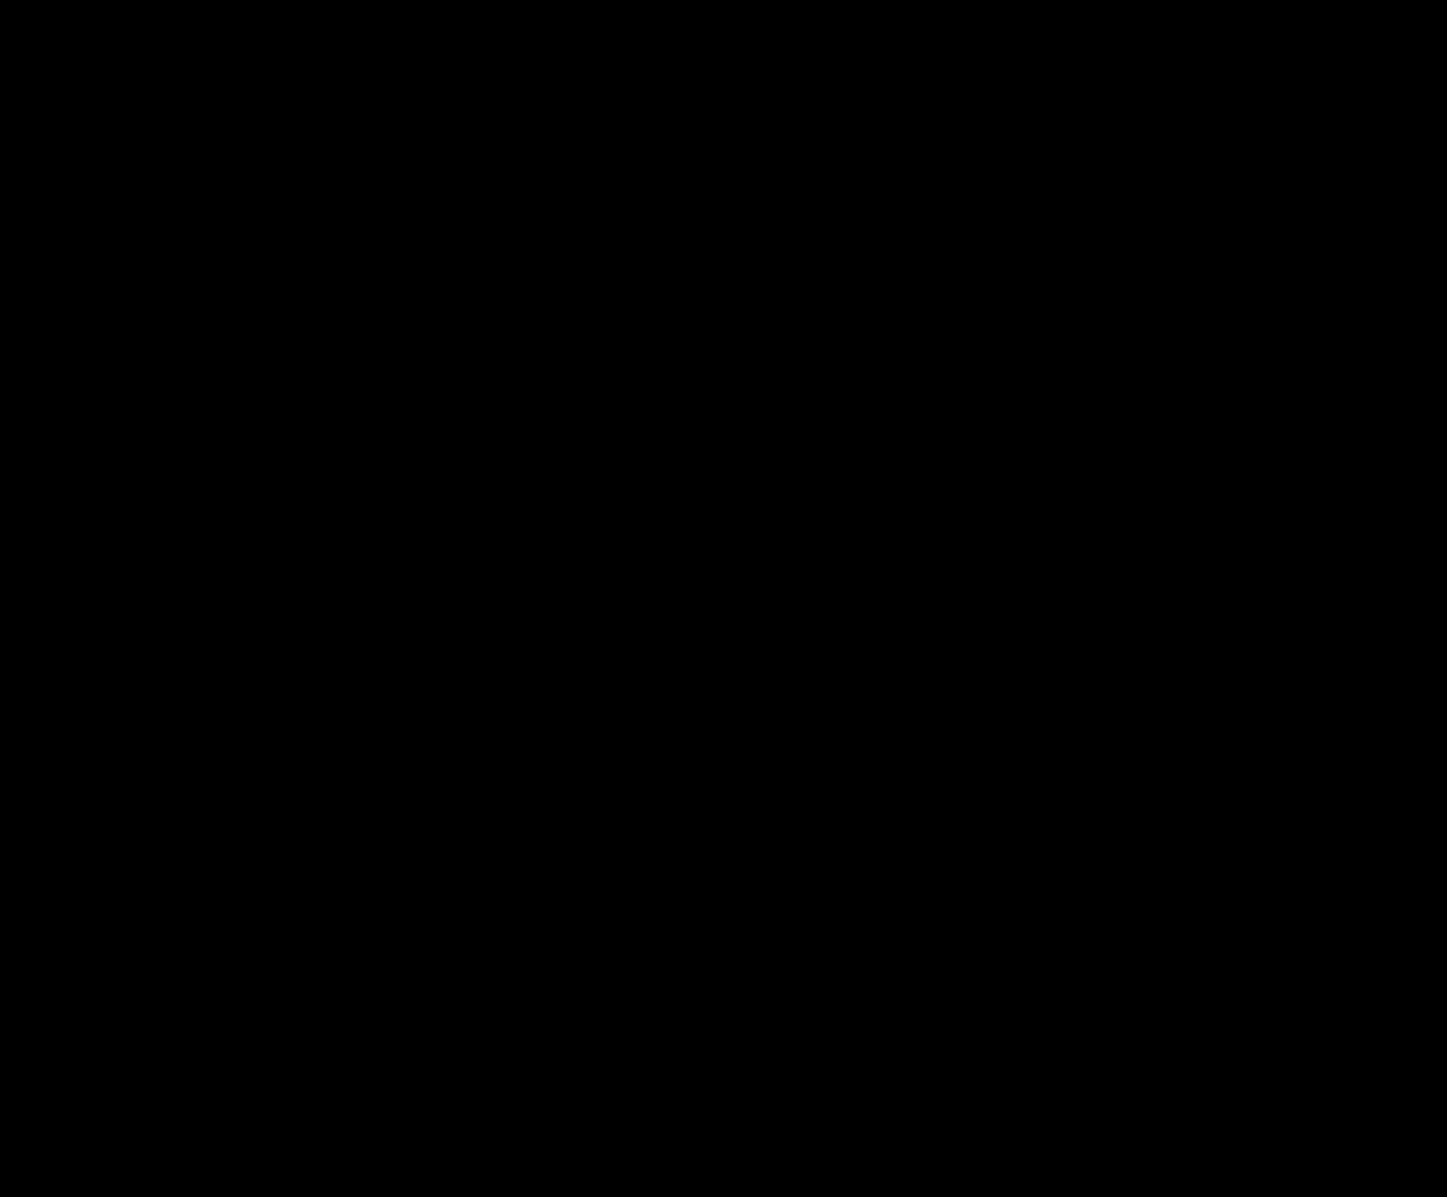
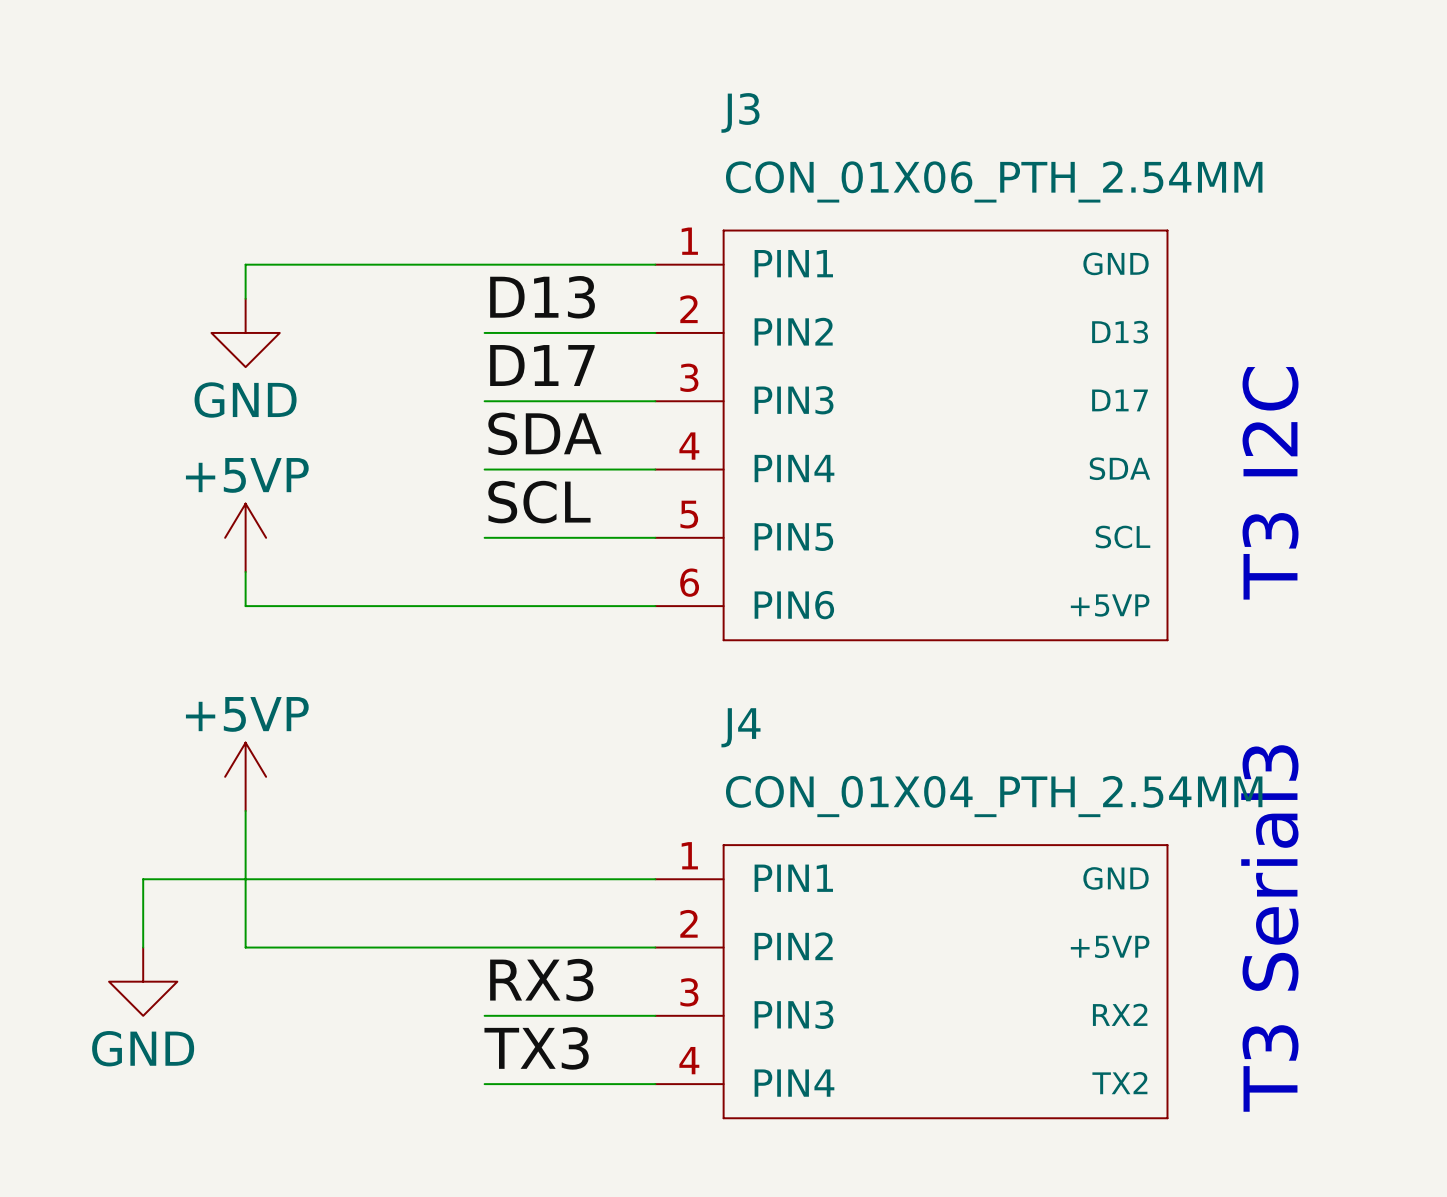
wire: none -> (655, 264) (245, 264) (245, 298)
label: none -> D13 (542, 297)
power symbol: none -> GND (245, 332)
wire: none -> (484, 332) (655, 332)
label: none -> D17 (542, 365)
wire: none -> (484, 401) (655, 401)
label: none -> SDA (544, 433)
J3: none -> CON_01X06_PTH_2.54MM (911, 435)
text: none -> T3 I2C (1270, 483)
wire: none -> (484, 469) (655, 469)
label: none -> SCL (539, 502)
power symbol: none -> +5VP (245, 537)
wire: none -> (484, 537) (655, 537)
wire: none -> (245, 571) (245, 606) (655, 606)
power symbol: none -> +5VP (245, 776)
wire: none -> (245, 810) (245, 947) (655, 947)
wire: none -> (655, 879) (143, 879) (143, 947)
text: none -> T3 Serial3 (1269, 928)
label: none -> RX3 (541, 980)
power symbol: none -> GND (143, 981)
J4: none -> CON_01X04_PTH_2.54MM (911, 981)
wire: none -> (484, 1015) (655, 1015)
label: none -> TX3 (536, 1048)
wire: none -> (484, 1084) (655, 1084)

